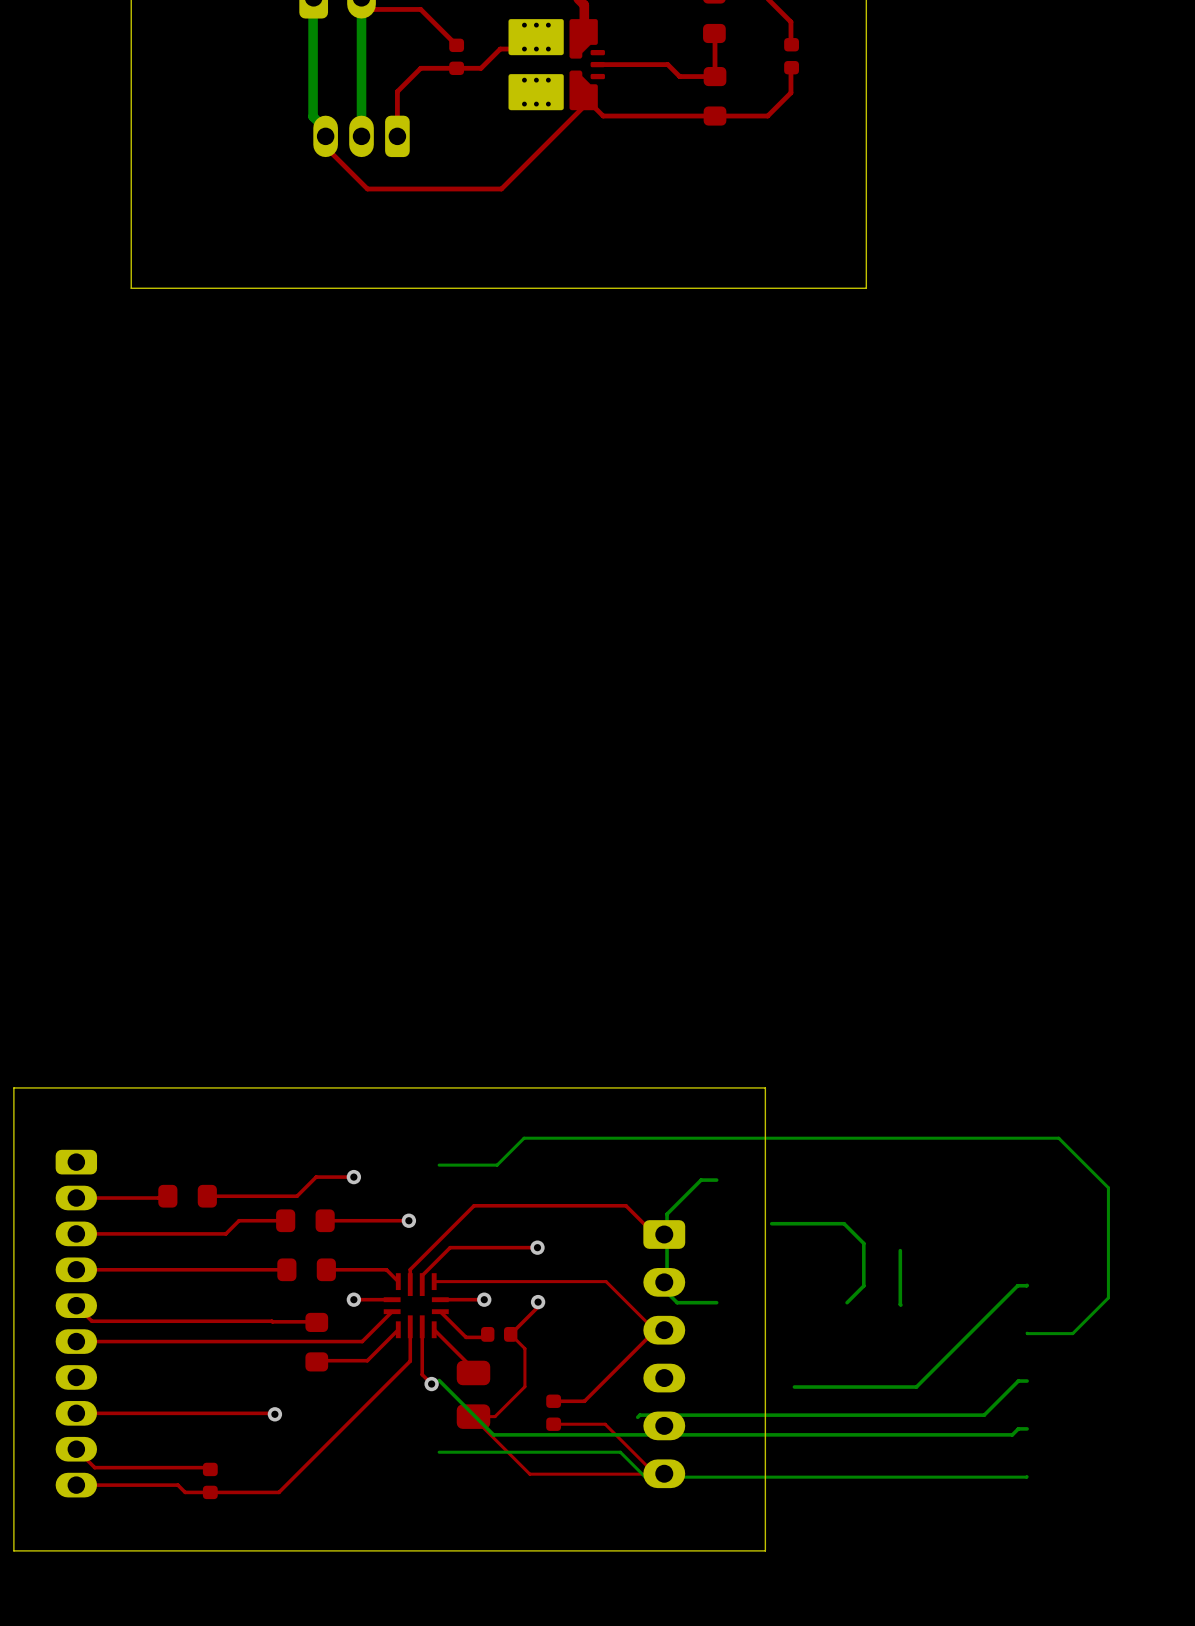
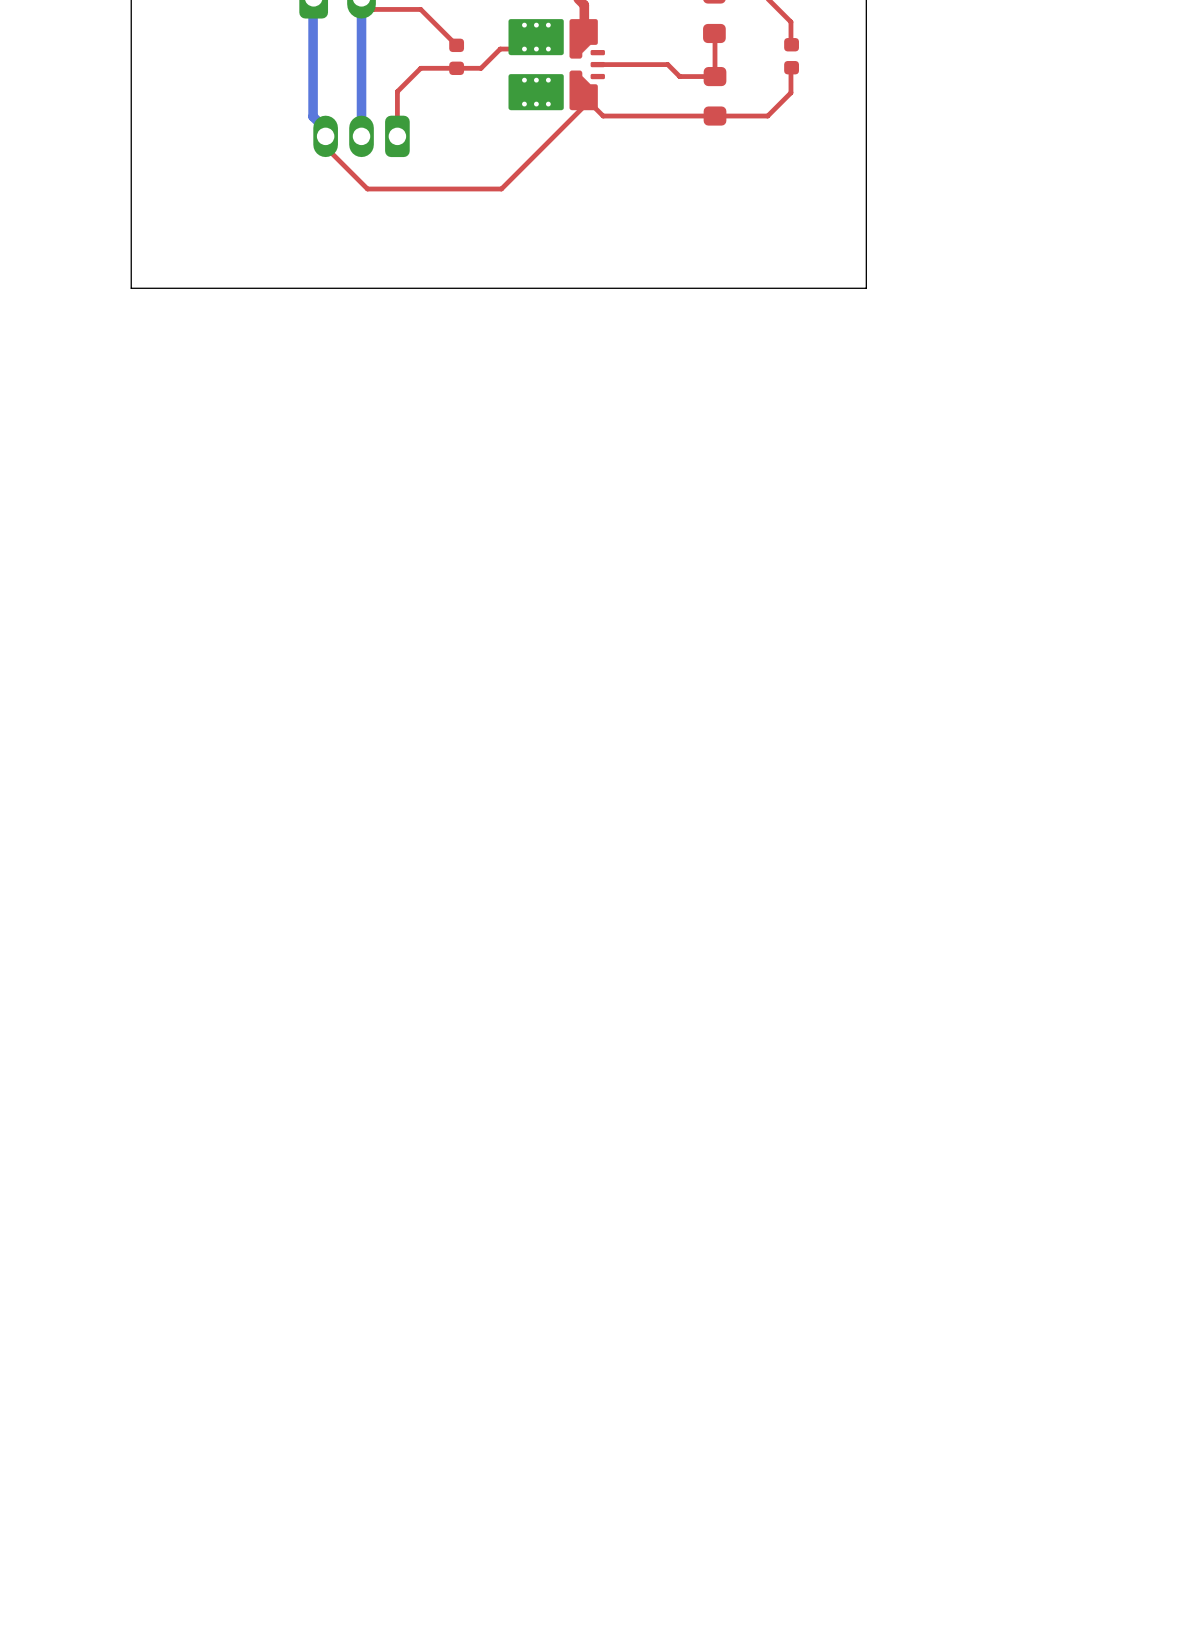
board edge: (765, 1087) (13, 1087) (13, 1550) (765, 1550) (765, 1087) -> none
bottom track: (439, 1165) (497, 1165) (524, 1138) (1058, 1138) (1108, 1187) (1108, 1297) (1072, 1333) (1027, 1333) -> none
top track: (353, 1177) (316, 1177) (297, 1196) (207, 1196) -> none
via: (353, 1177) -> none
bottom track: (716, 1180) (701, 1180) (667, 1214) (667, 1292) (677, 1302) (716, 1302) -> none
top track: (167, 1196) (158, 1198) (76, 1198) -> none
part: (187, 1196) -> none
top track: (285, 1220) (239, 1220) (225, 1233) (76, 1233) -> none
part: (305, 1220) -> none
top track: (408, 1220) (325, 1220) -> none
via: (408, 1220) -> none
bottom track: (771, 1223) (844, 1223) (863, 1243) (863, 1285) (847, 1302) -> none
top track: (664, 1234) (654, 1234) (626, 1205) (474, 1205) (410, 1269) (410, 1284) -> none
top track: (537, 1247) (450, 1247) (422, 1275) (422, 1284) -> none
via: (537, 1247) -> none
bottom track: (900, 1250) (900, 1305) -> none
top track: (286, 1269) (76, 1269) -> none
part: (306, 1269) -> none
top track: (326, 1269) (386, 1269) (398, 1281) -> none
top track: (434, 1281) (606, 1281) (654, 1330) (664, 1330) (655, 1330) (584, 1401) (553, 1401) -> none
bottom track: (1027, 1285) (1017, 1285) (916, 1387) (794, 1387) -> none
via: (353, 1299) -> none
top track: (392, 1299) (353, 1299) -> none
top track: (484, 1299) (440, 1299) -> none
via: (484, 1299) -> none
top track: (538, 1302) (538, 1306) (510, 1334) (524, 1348) (524, 1386) (495, 1416) (473, 1417) (529, 1474) (664, 1473) (654, 1473) (605, 1424) (553, 1424) -> none
via: (538, 1302) -> none
top track: (76, 1305) (91, 1321) (316, 1322) -> none
part: (416, 1305) -> none
top track: (392, 1311) (362, 1341) (76, 1341) -> none
top track: (440, 1311) (466, 1337) (484, 1337) (487, 1334) -> none
part: (76, 1323) -> none
top track: (410, 1326) (410, 1361) (278, 1492) (185, 1492) (177, 1485) (76, 1485) (78, 1487) -> none
top track: (422, 1326) (422, 1374) (431, 1384) -> none
top track: (398, 1329) (367, 1360) (316, 1361) -> none
top track: (434, 1329) (473, 1369) (473, 1372) -> none
part: (499, 1334) -> none
part: (316, 1342) -> none
part: (664, 1354) -> none
bottom track: (439, 1380) (493, 1434) (1012, 1434) (1018, 1428) (1027, 1428) -> none
bottom track: (1027, 1381) (1018, 1381) (984, 1415) (639, 1415) (637, 1417) -> none
via: (431, 1384) -> none
part: (473, 1394) -> none
part: (553, 1412) -> none
top track: (76, 1413) (274, 1414) -> none
via: (274, 1414) -> none
top track: (76, 1449) (94, 1467) (208, 1467) (210, 1469) -> none
bottom track: (439, 1452) (620, 1452) (645, 1477) (1027, 1476) -> none
part: (210, 1480) -> none

